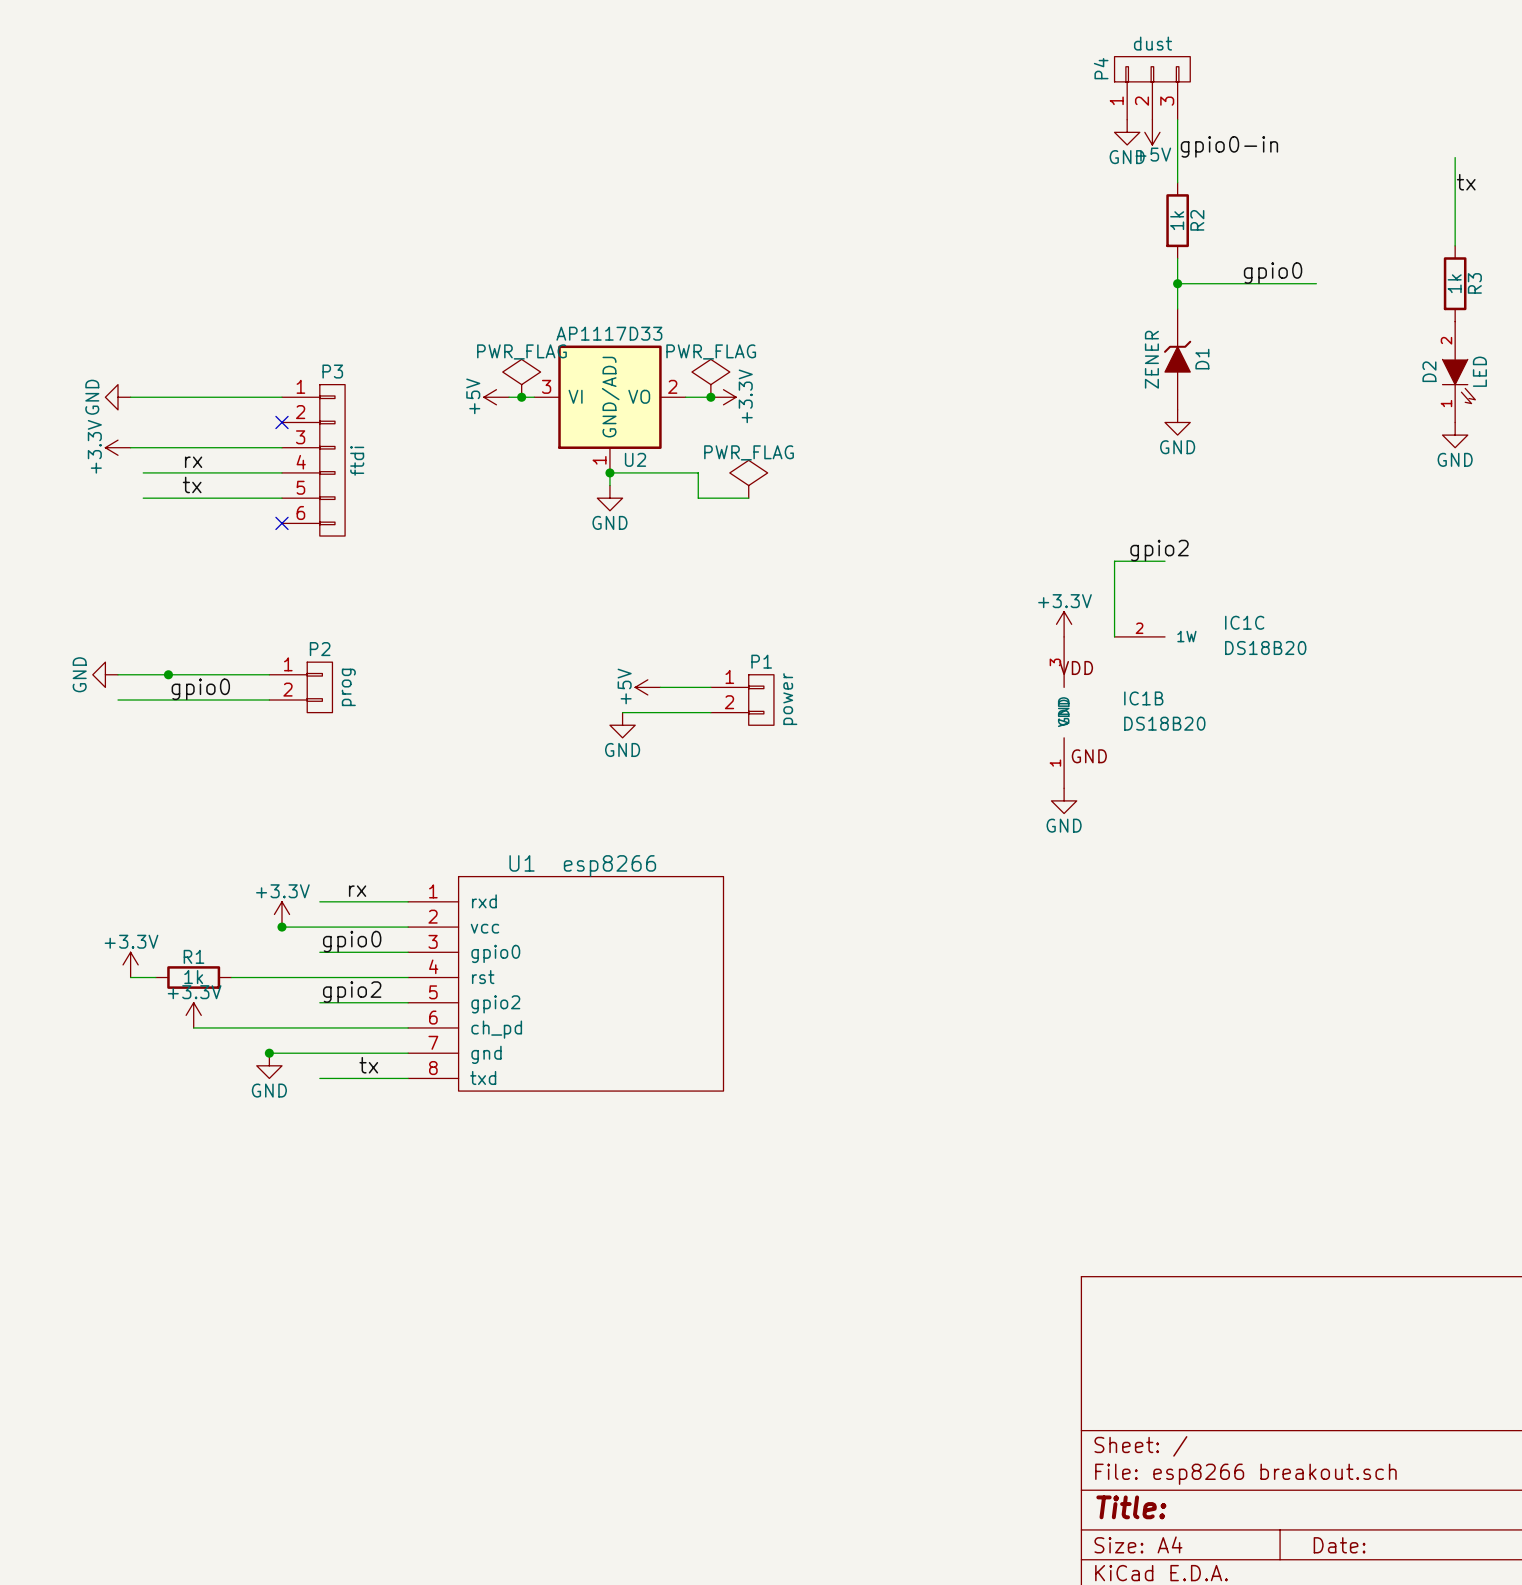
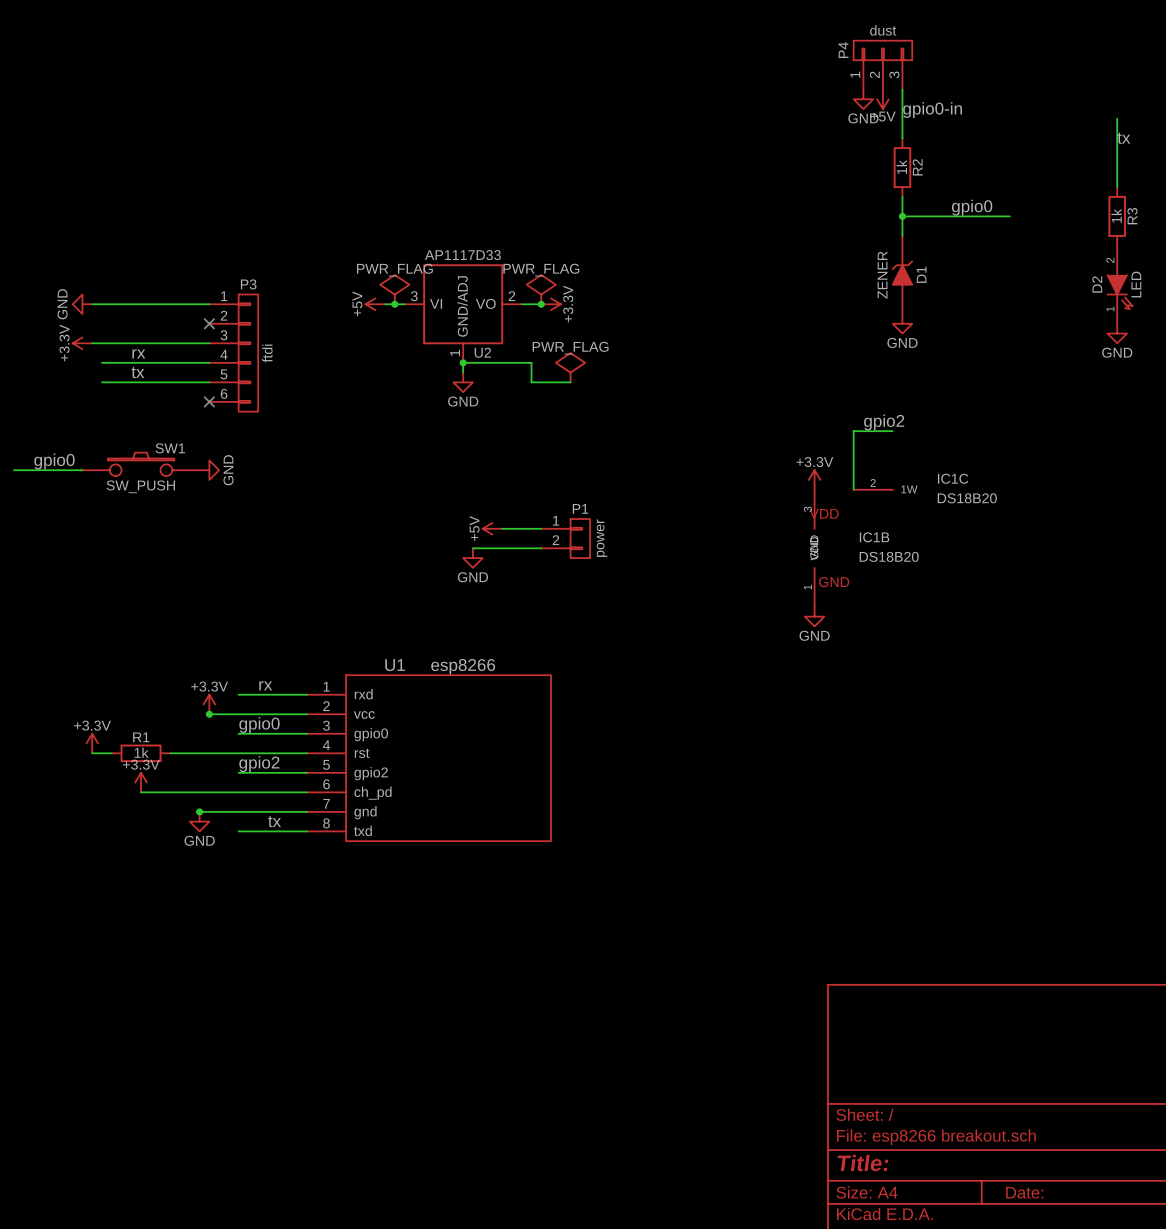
SW1: none -> SW_PUSH (141, 464)
wire: none -> (14, 470) (82, 470)
power symbol rotation: 0° (105, 674) -> 180° (209, 470)
power symbol position: GND (105, 674) -> GND (209, 470)
wire: (118, 674) (269, 674) -> none
junction: (168, 674) -> none
P2: prog (300, 687) -> none
label position: gpio0 (200, 689) -> gpio0 (54, 461)
wire: (118, 700) (269, 700) -> none

